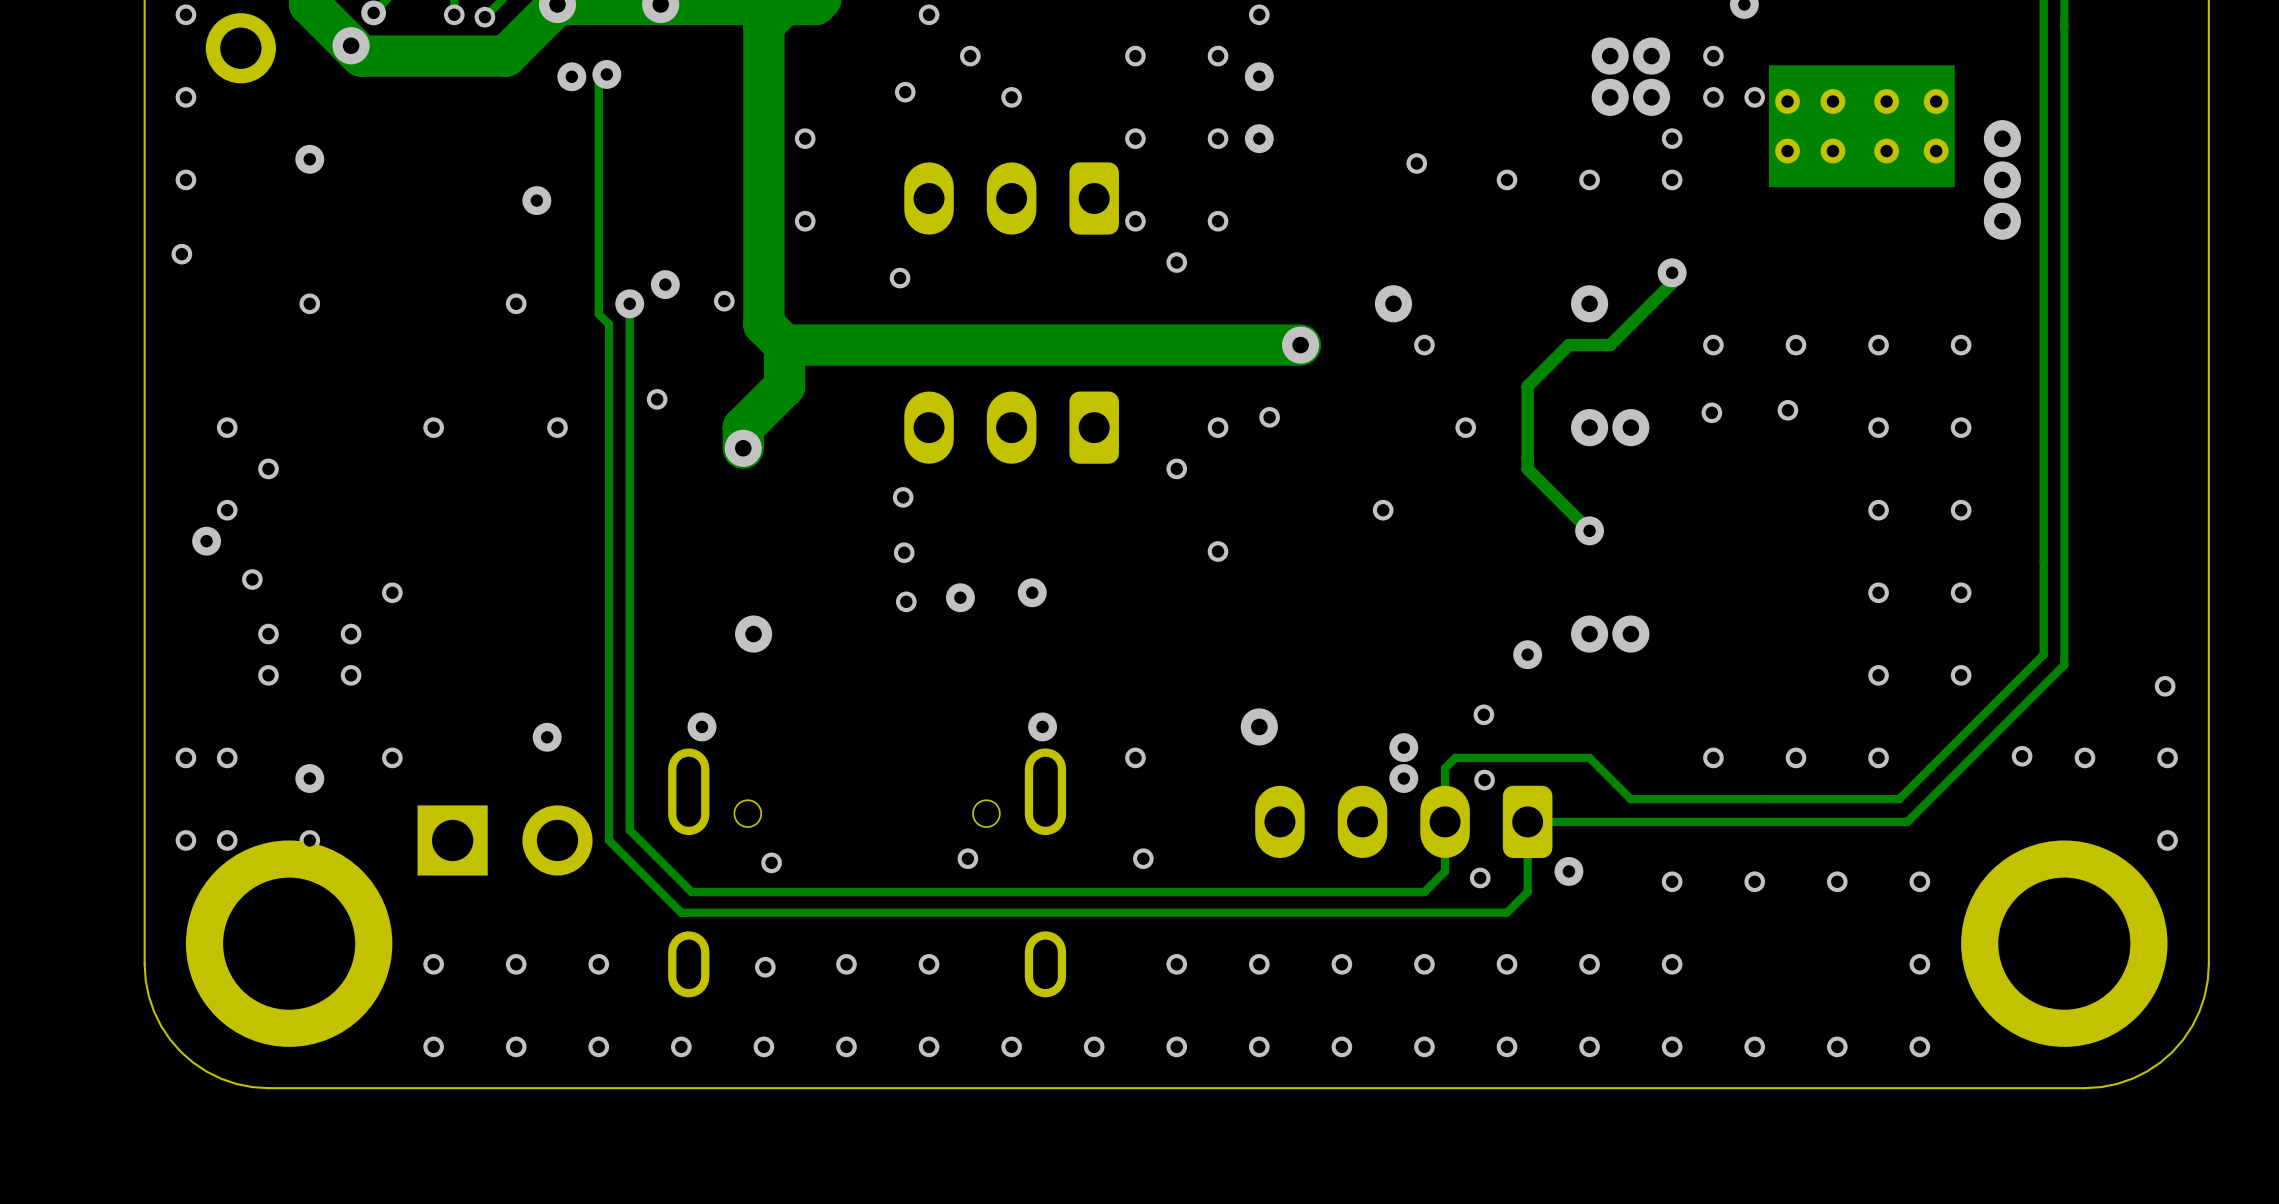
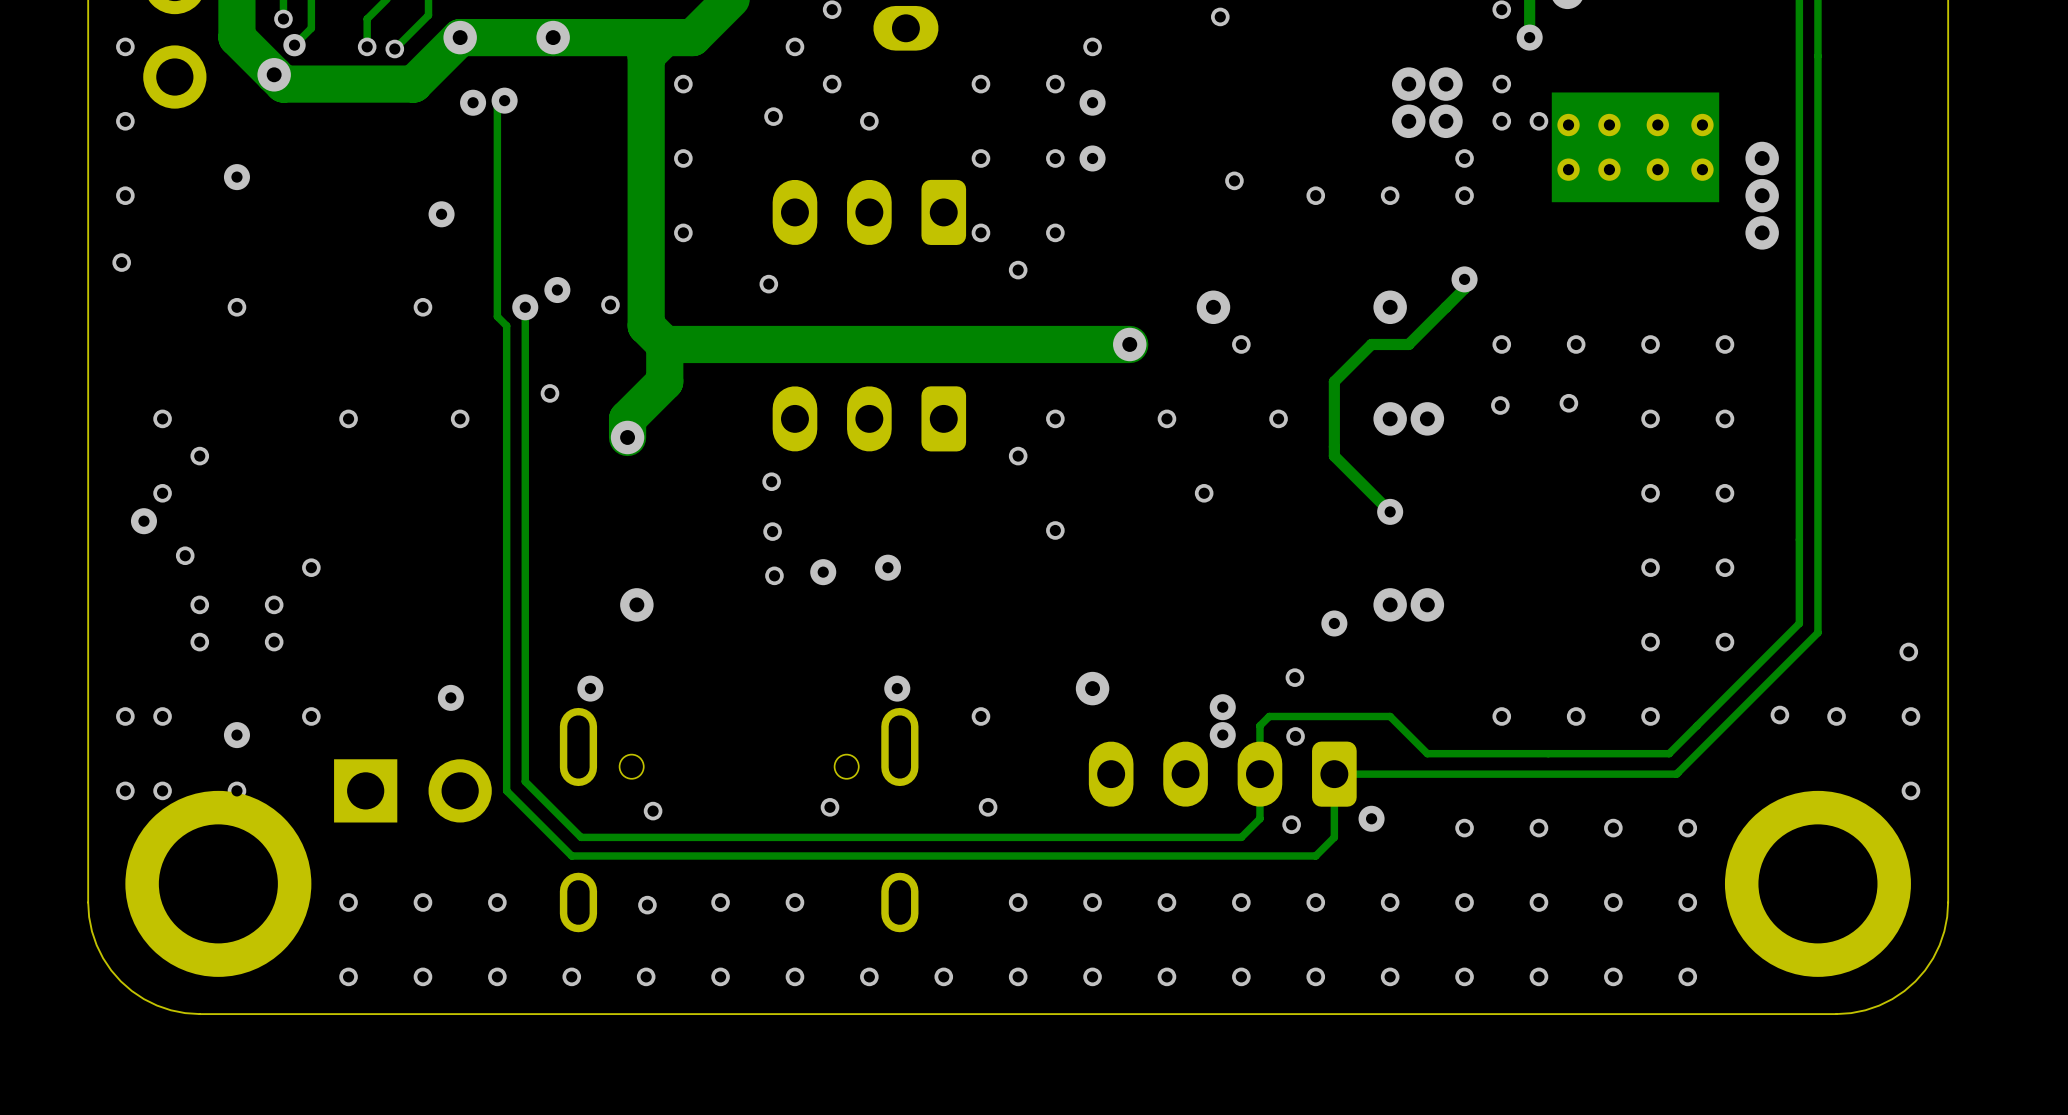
via: none -> (683, 84)
via position: (1269, 417) -> (1166, 418)
via: none -> (1538, 902)
via: none -> (1613, 902)

